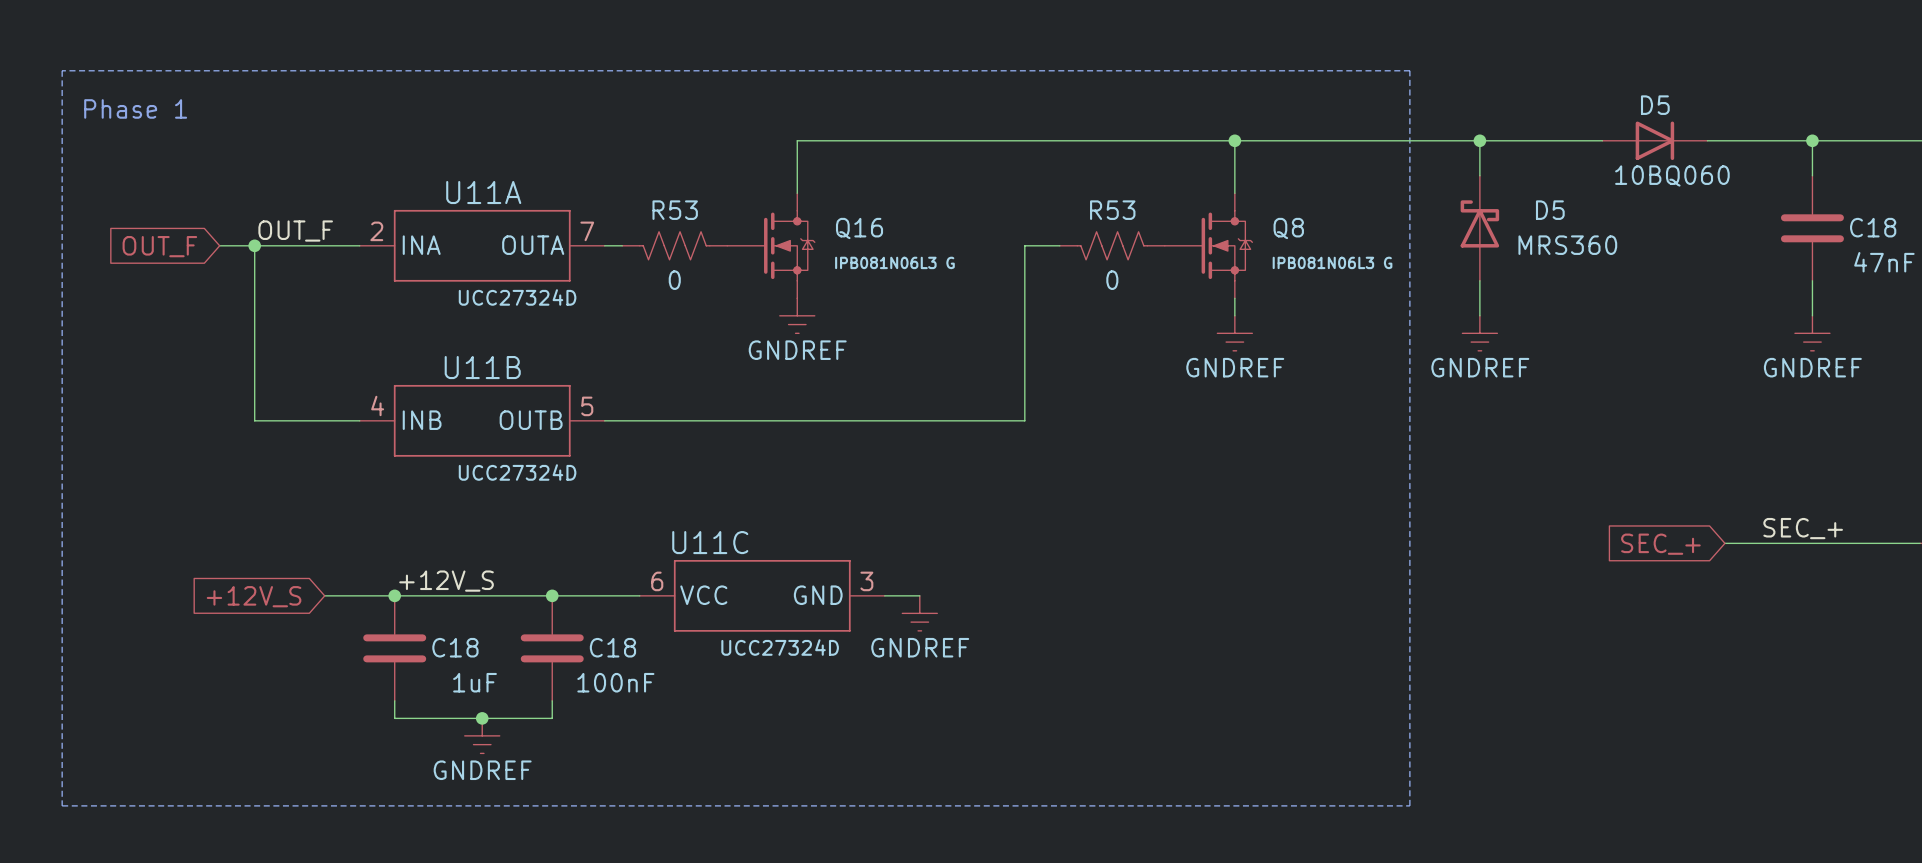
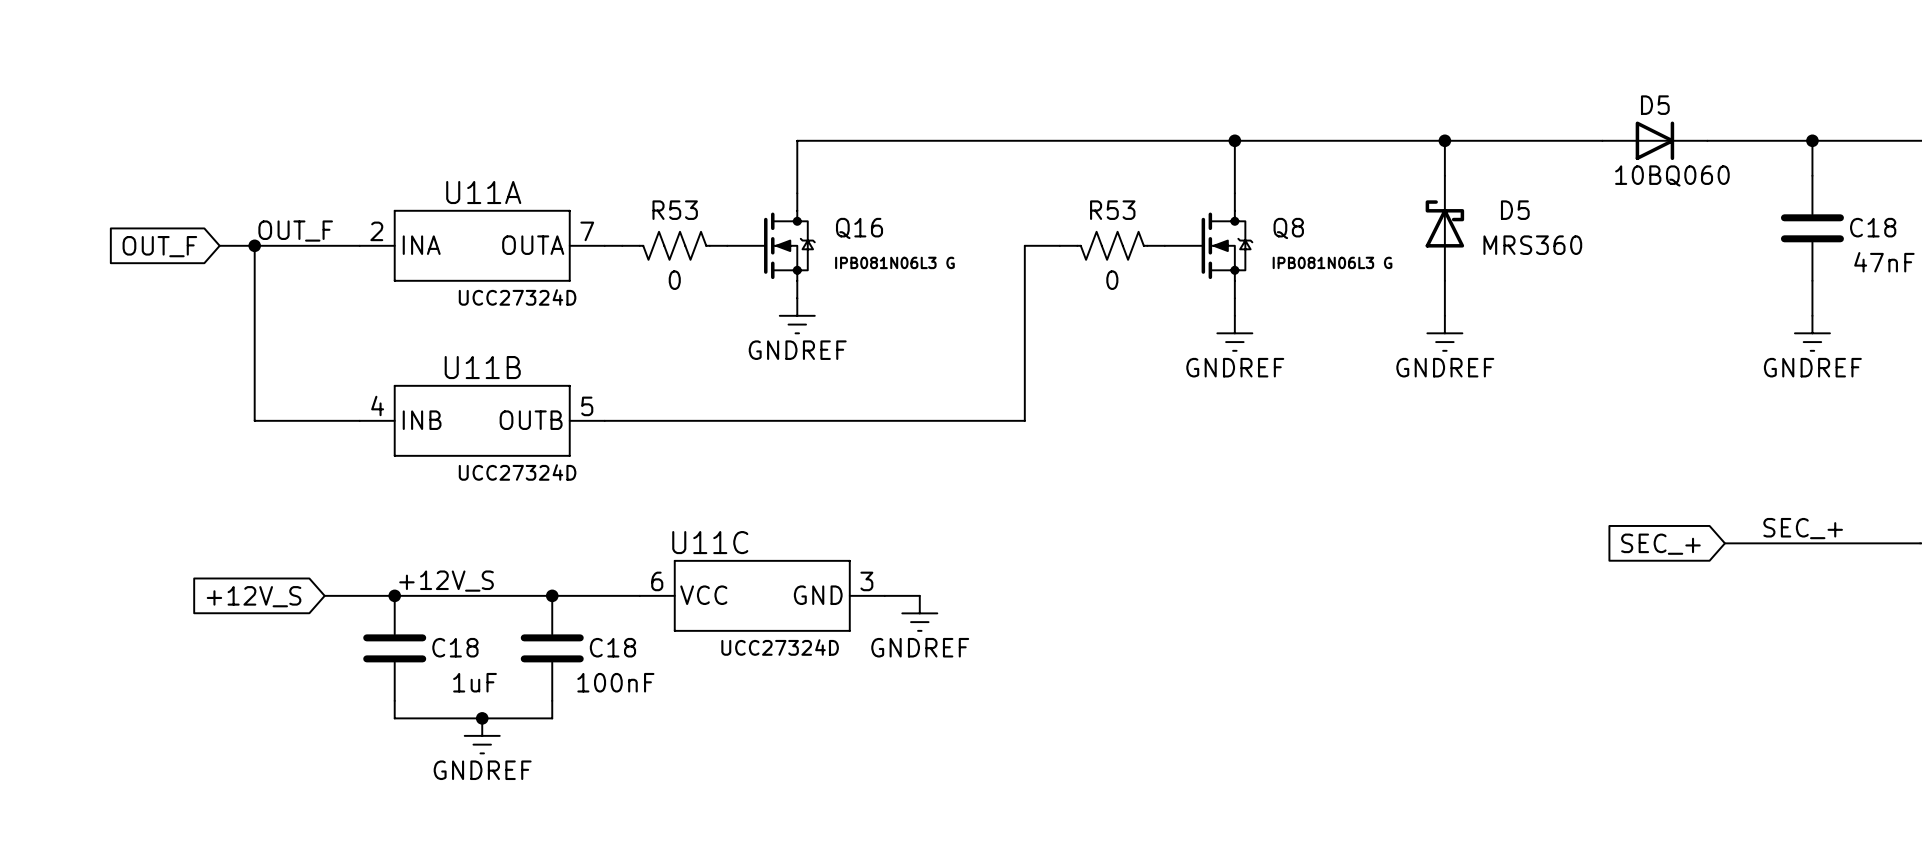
line: (62, 70) (62, 805) (1409, 805) (1409, 70) (62, 70) -> none
text: Phase 1 (135, 108) -> none
wire: (1479, 140) (1479, 175) -> (1444, 140) (1444, 175)
junction position: (1479, 140) -> (1444, 140)
D5 position: (1479, 228) -> (1444, 228)
wire: (1479, 280) (1479, 315) -> (1444, 280) (1444, 315)
power symbol position: GNDREF (1479, 333) -> GNDREF (1444, 333)

